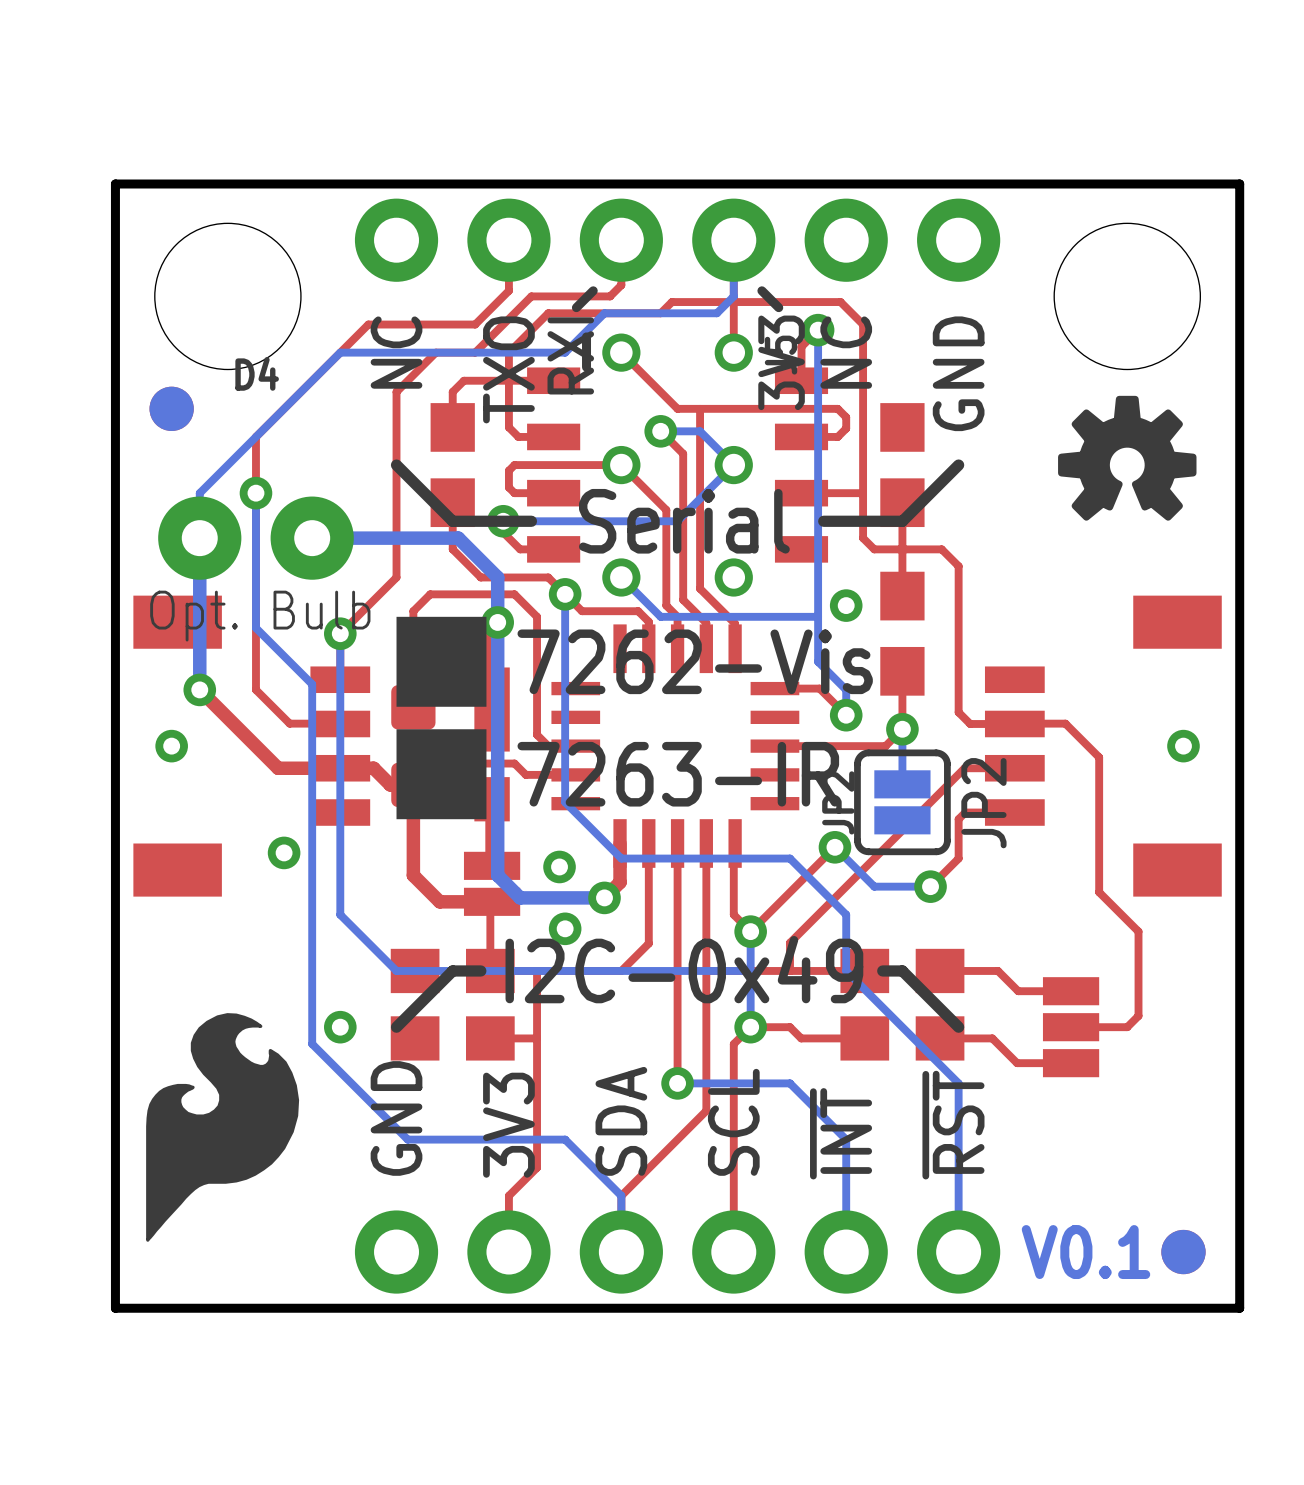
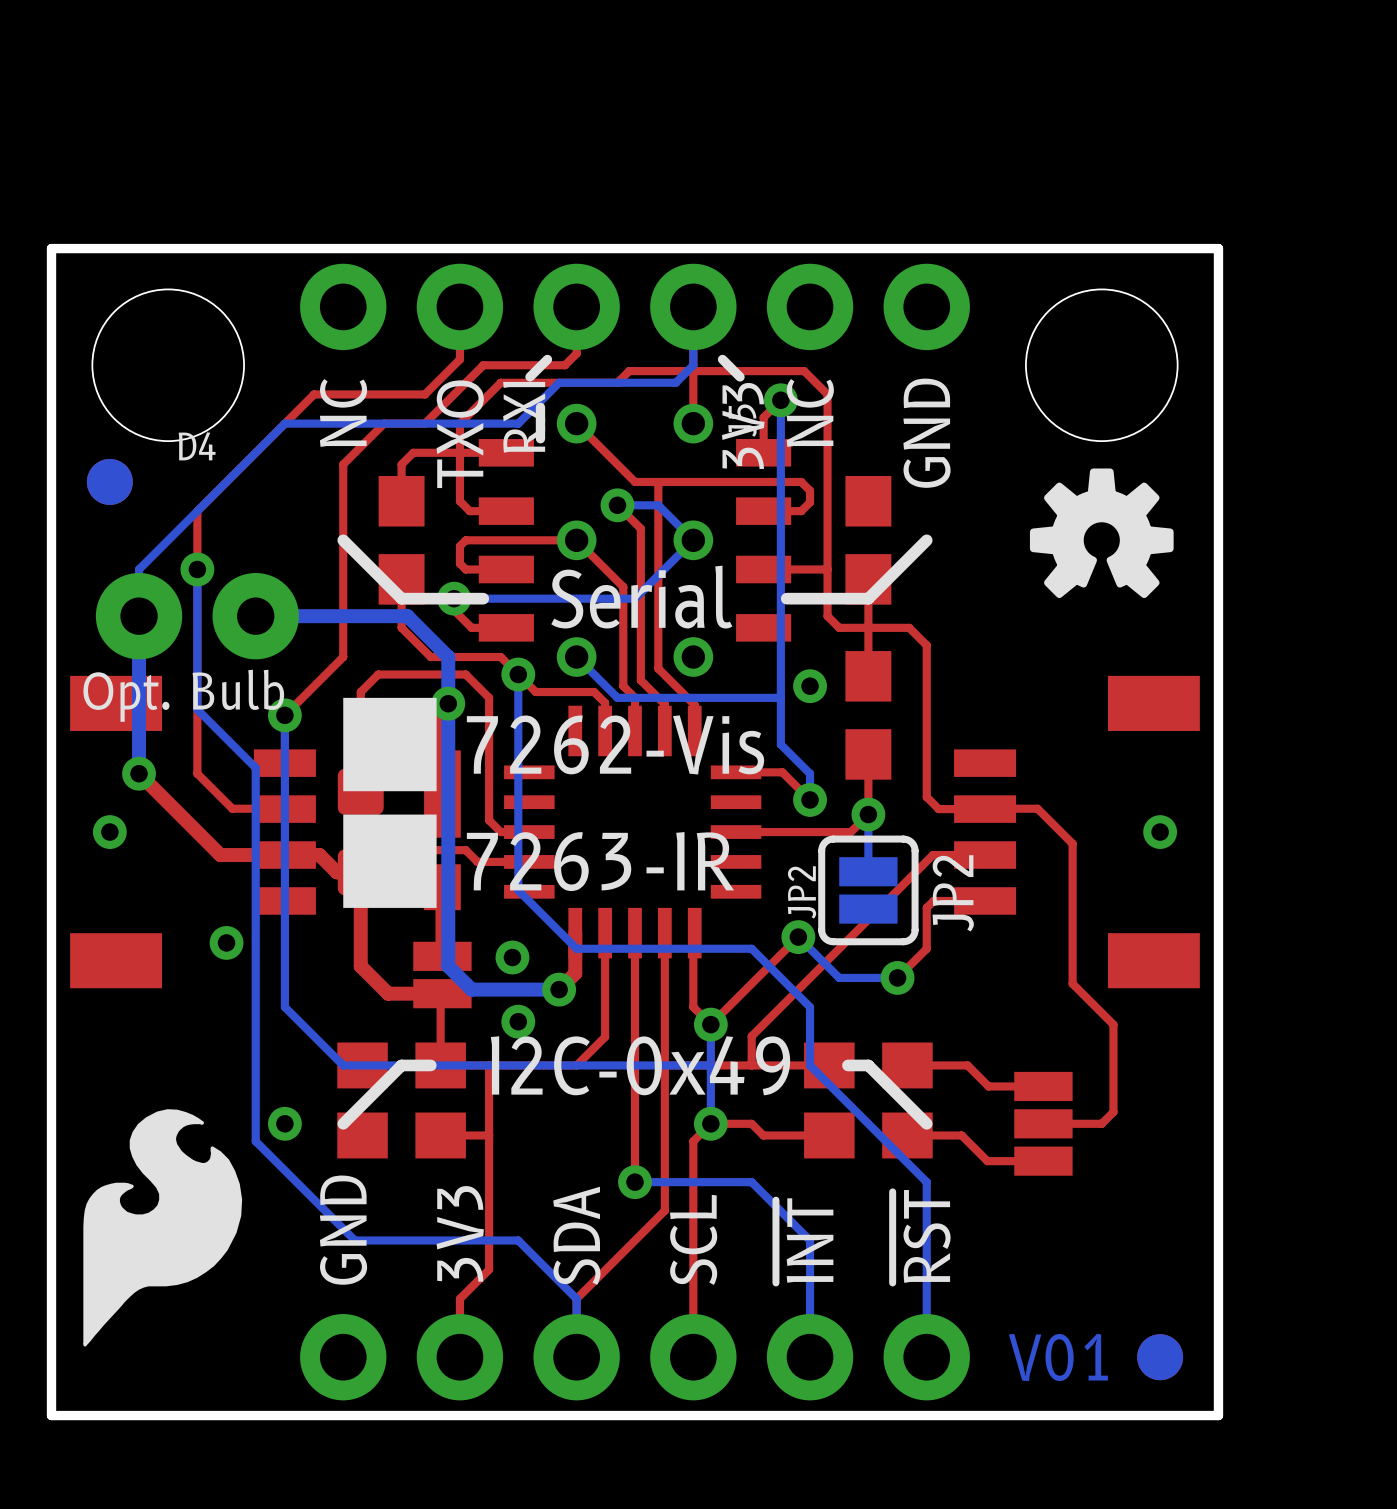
text: V0.1 (1086, 1252) -> V01 (1058, 1357)

